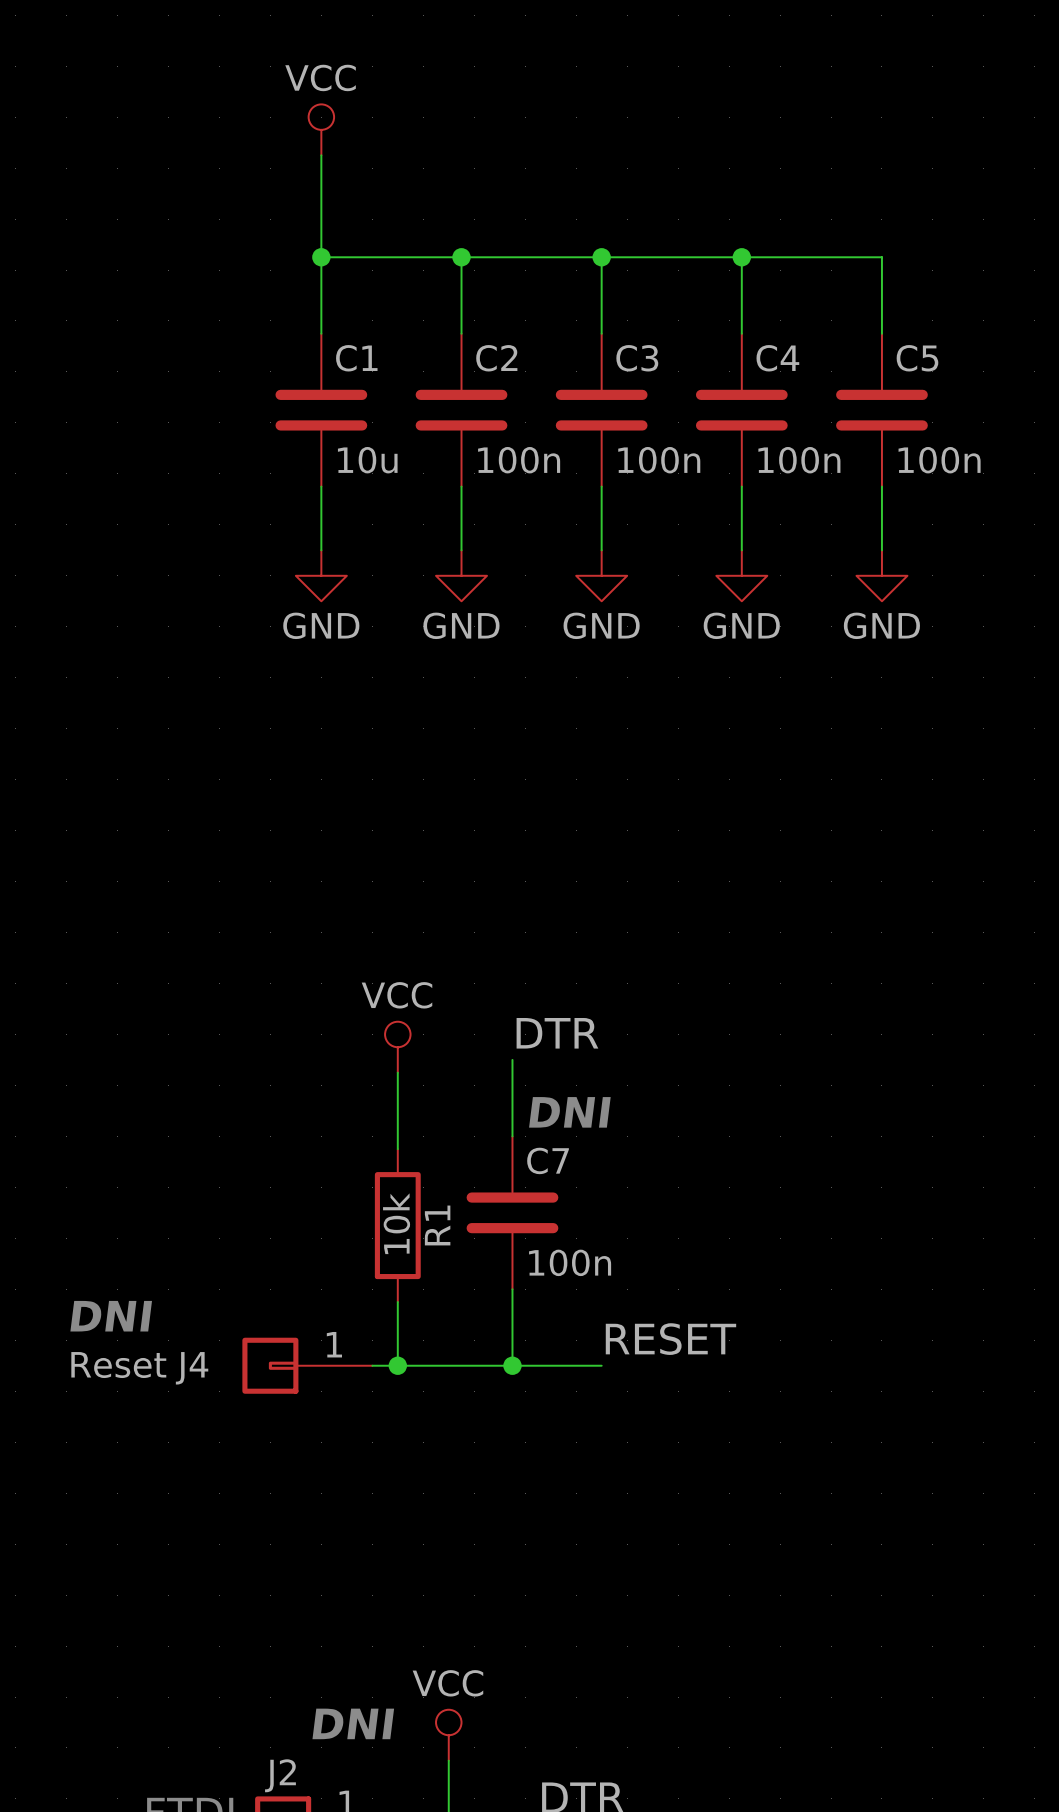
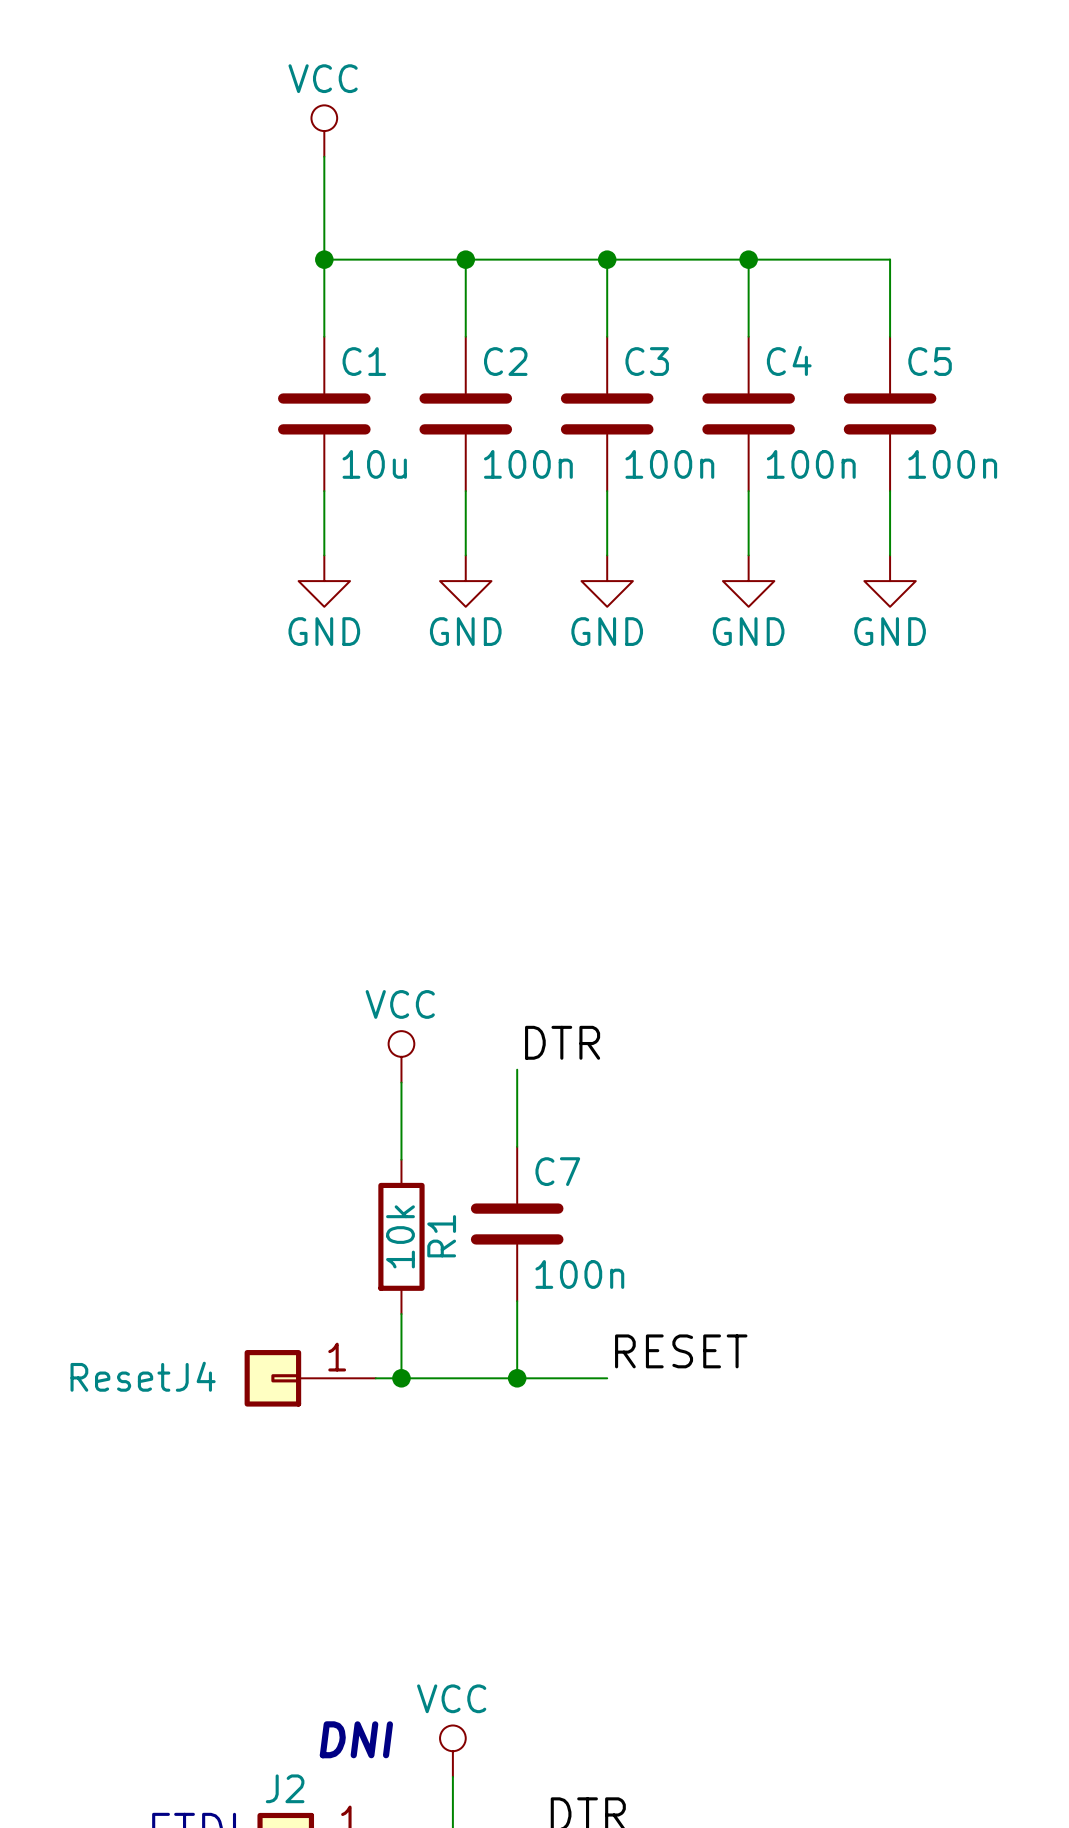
text: DNI (569, 1112) -> none
text: DNI (111, 1316) -> none

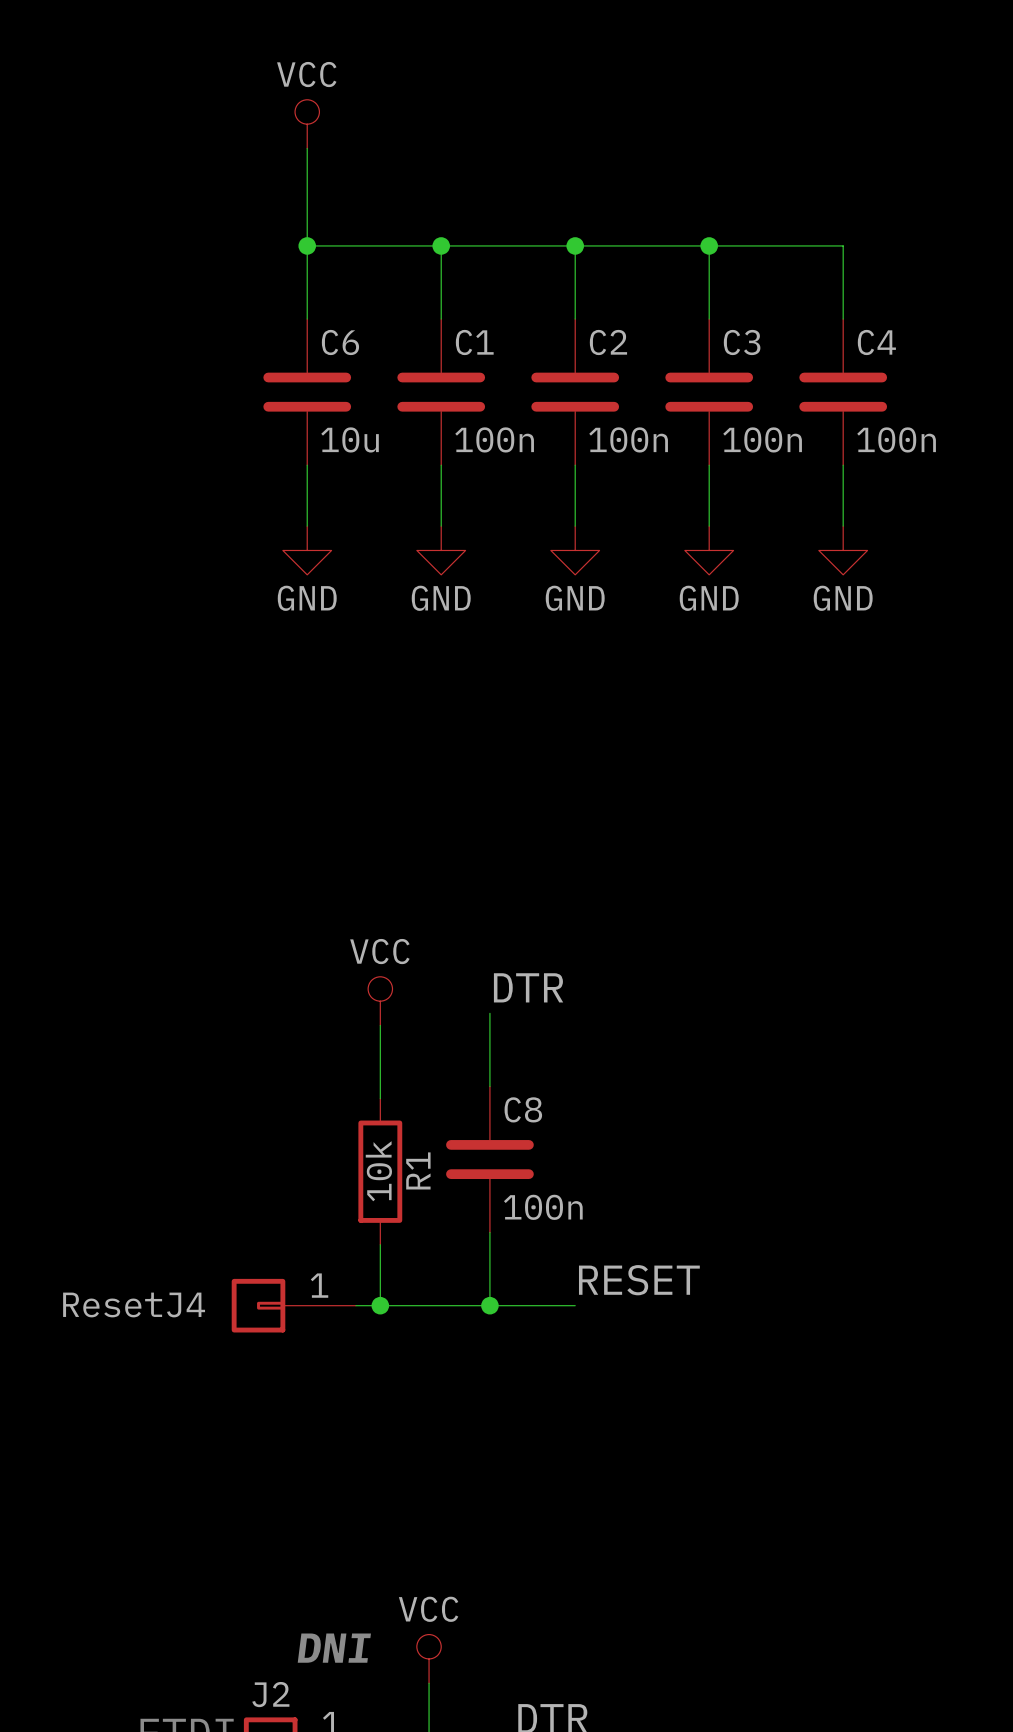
C4 name: C4 (789, 360) -> C3 (742, 342)
C1 name: C1 (364, 361) -> C6 (340, 342)
C2 name: C2 (505, 361) -> C1 (474, 342)
C3 name: C3 (647, 361) -> C2 (608, 342)
C5 name: C5 (930, 361) -> C4 (876, 342)
C7 name: C7 (557, 1171) -> C8 (523, 1109)

